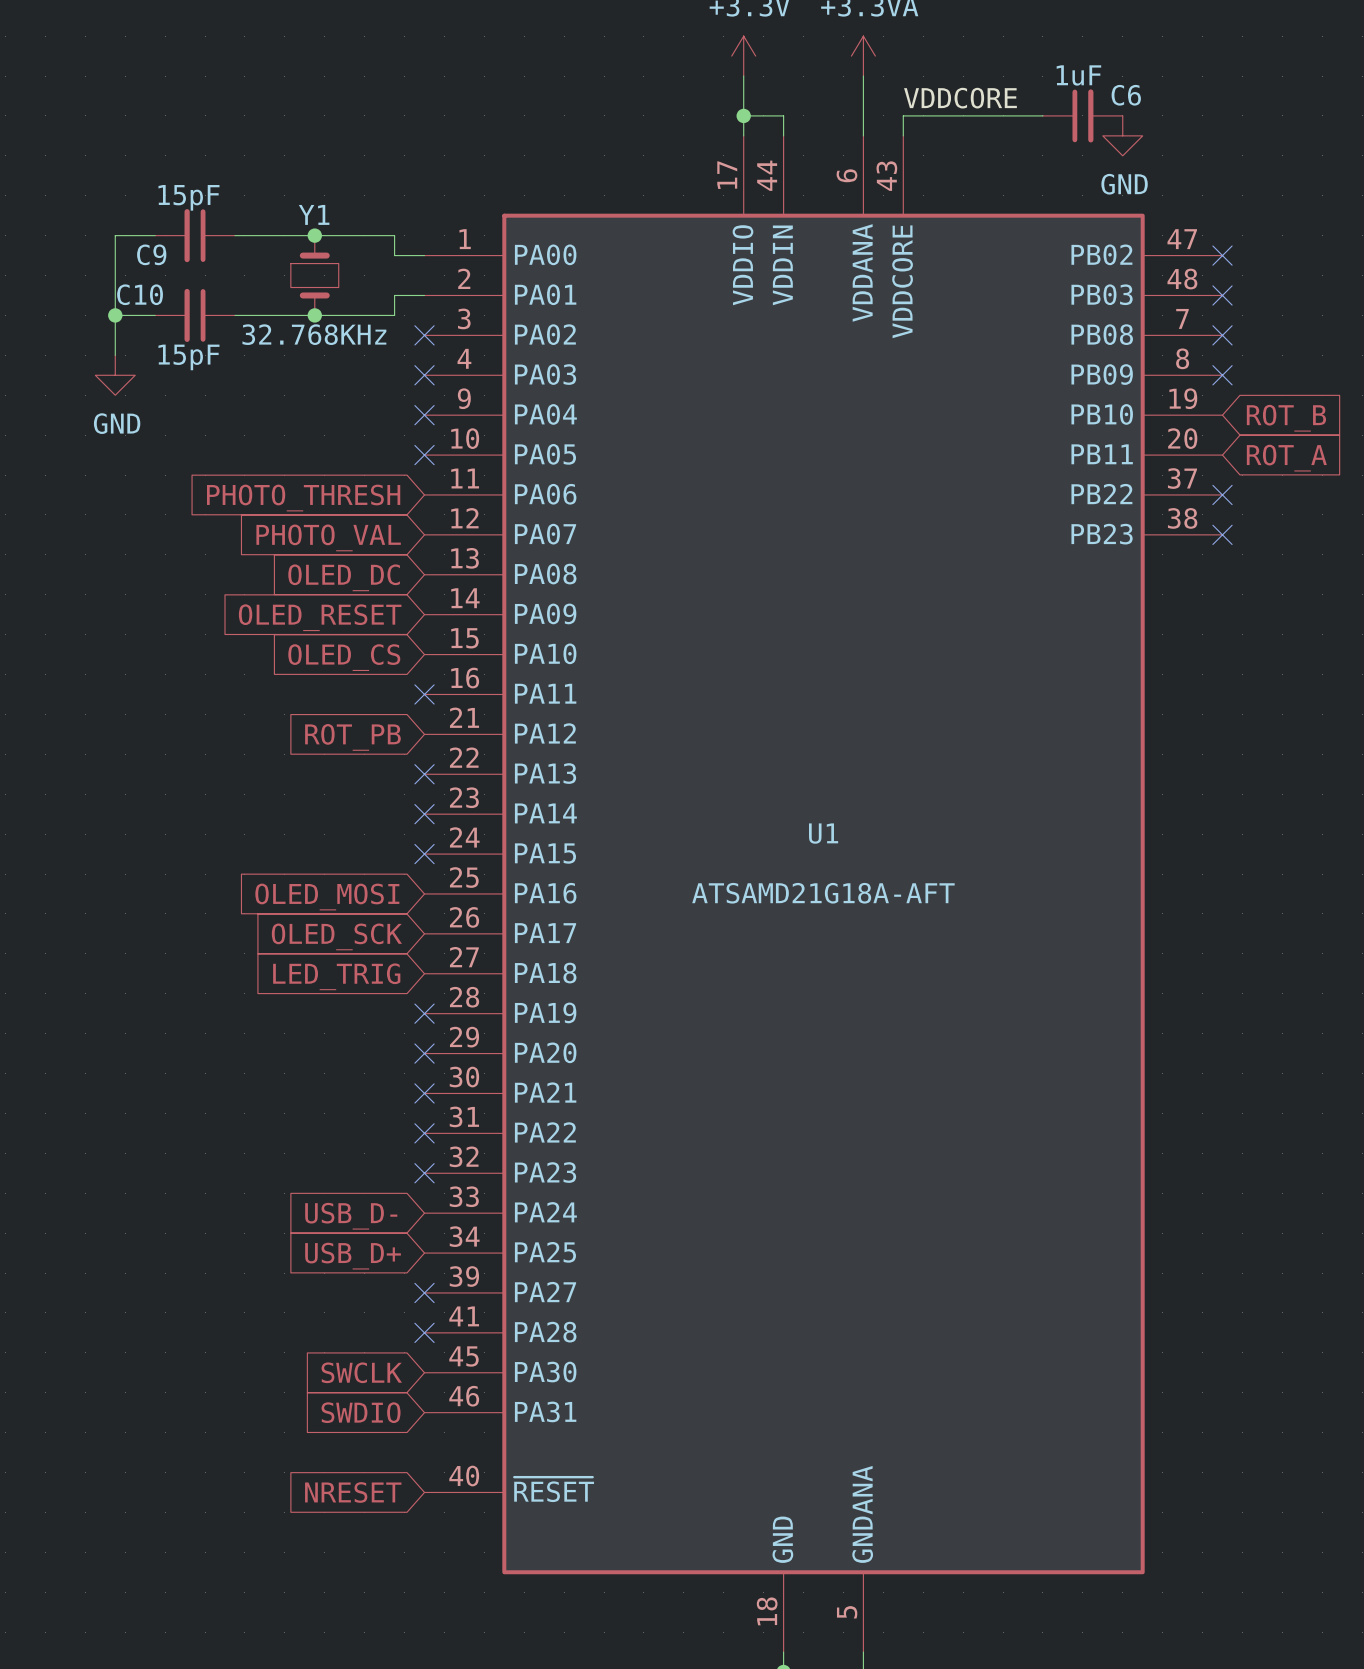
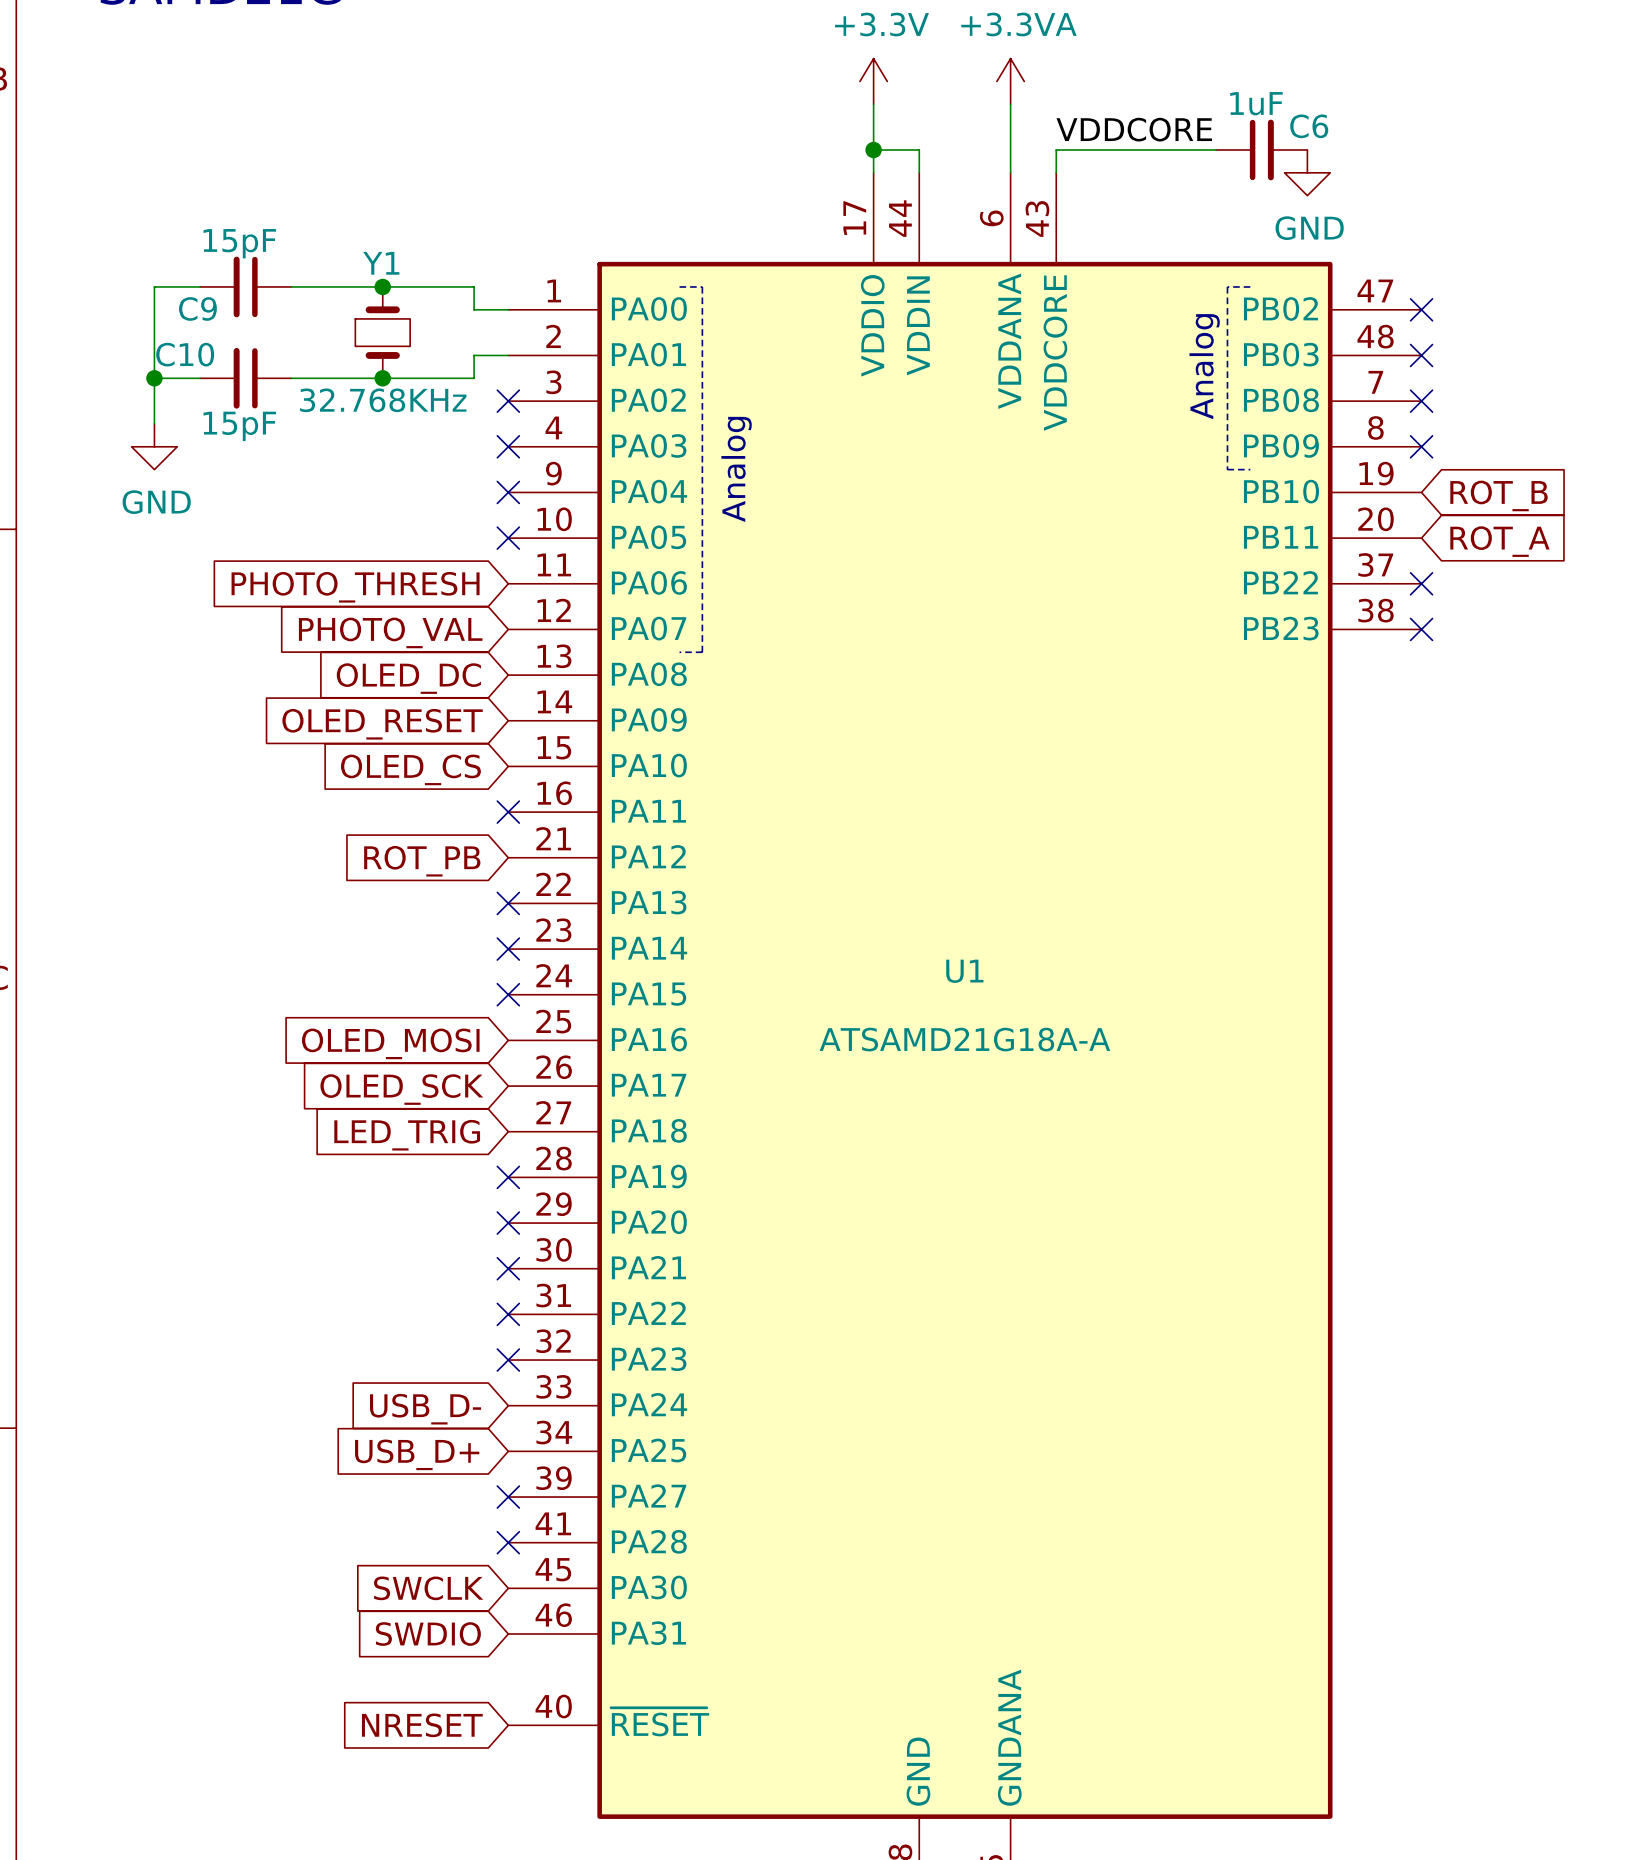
line: none -> (679, 286) (702, 286) (702, 652) (679, 652)
line: none -> (1250, 286) (1227, 286) (1227, 469) (1250, 469)
text: none -> Analog (1204, 366)
text: none -> Analog (736, 469)
U1 value: ATSAMD21G18A-AFT (823, 893) -> ATSAMD21G18A-A (964, 1039)

